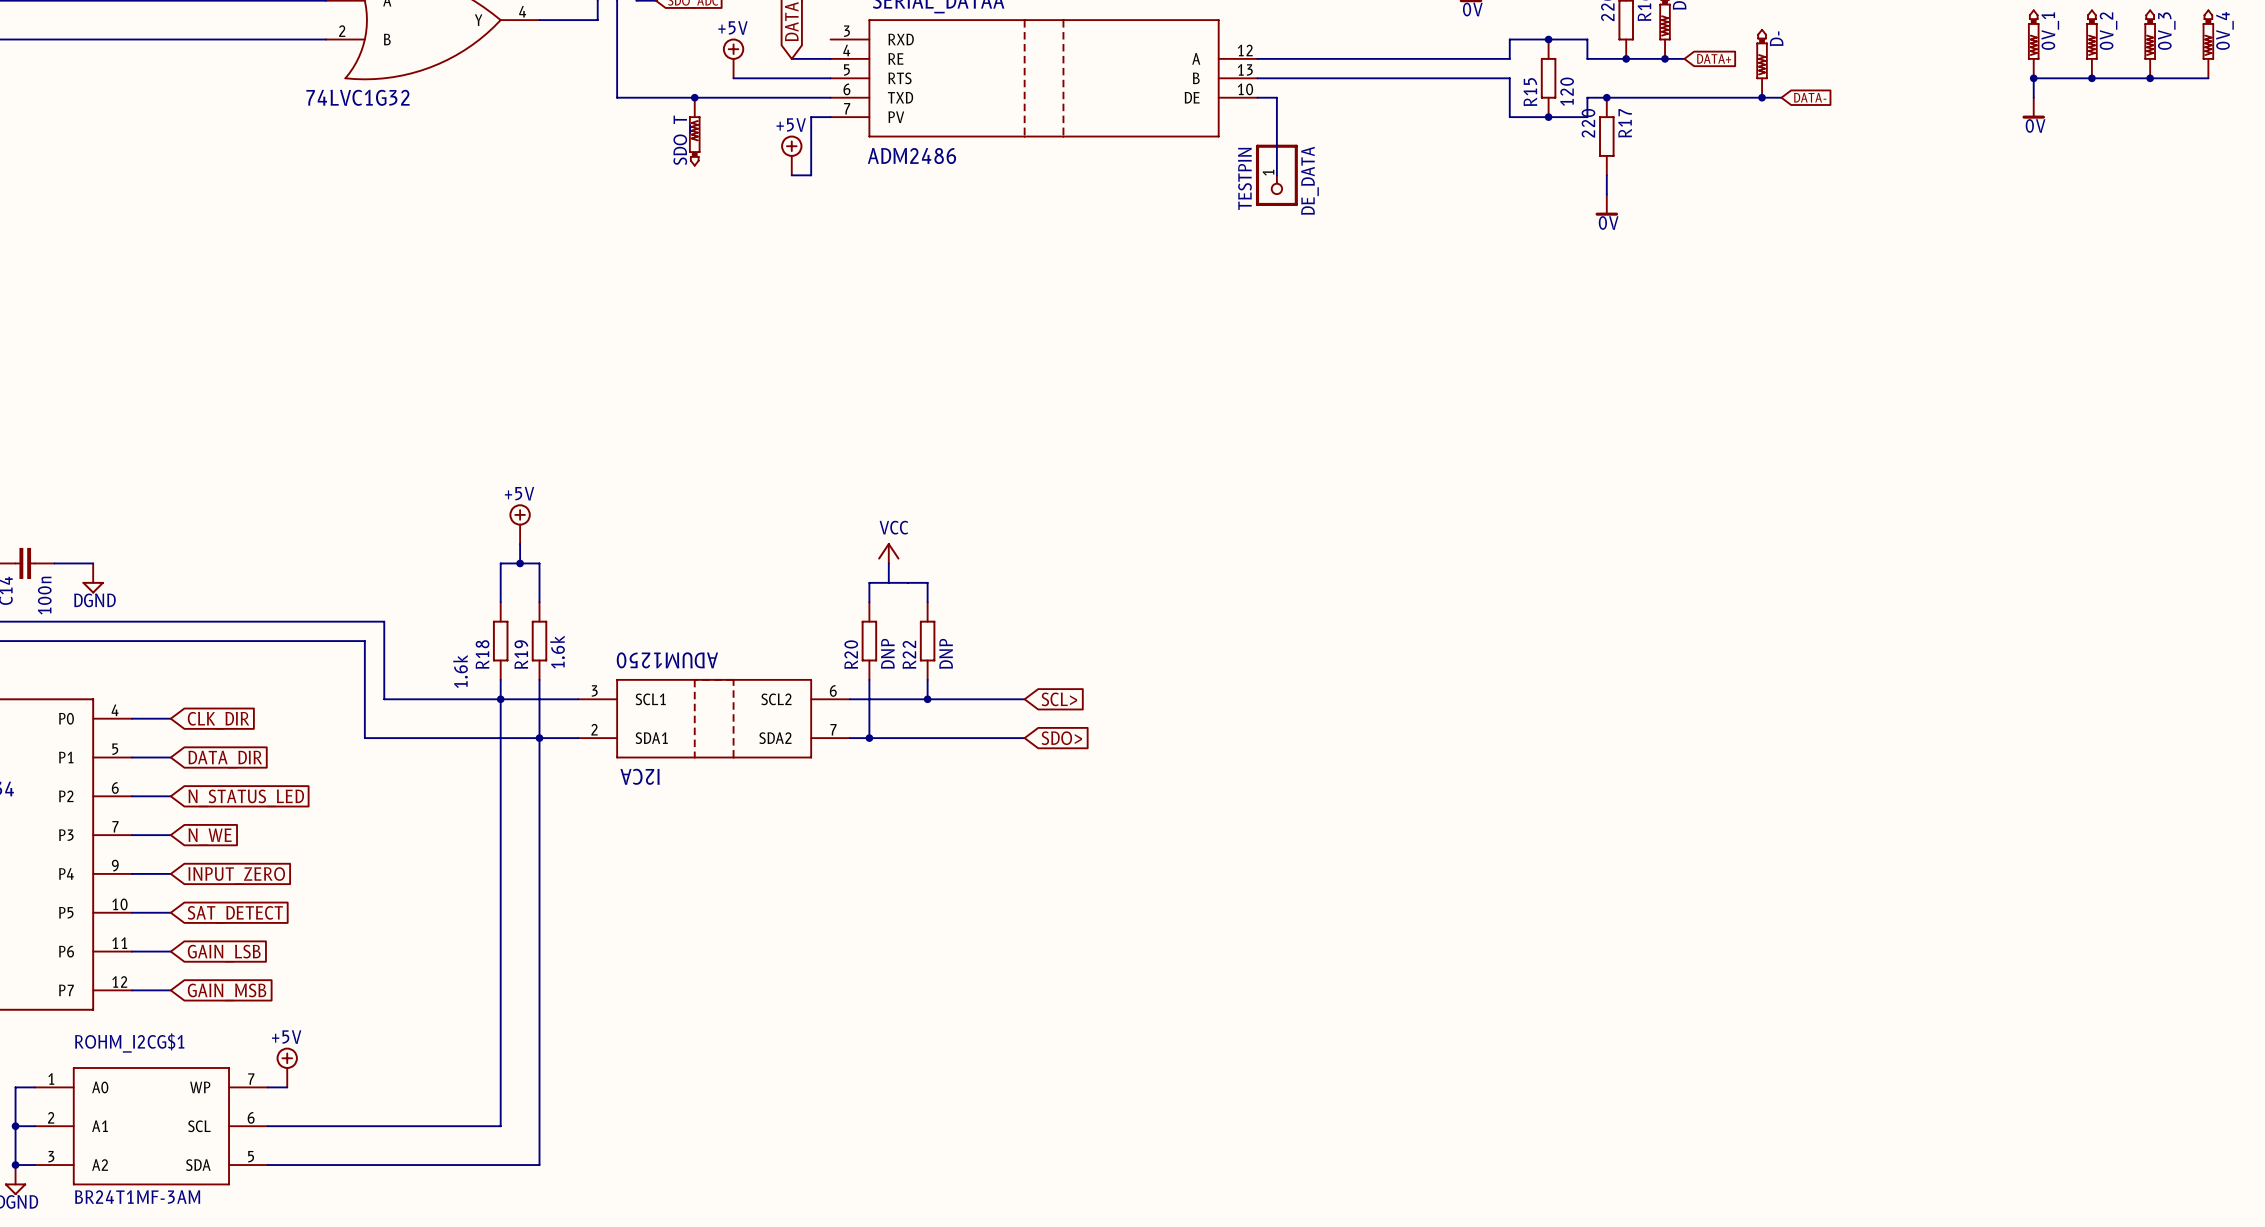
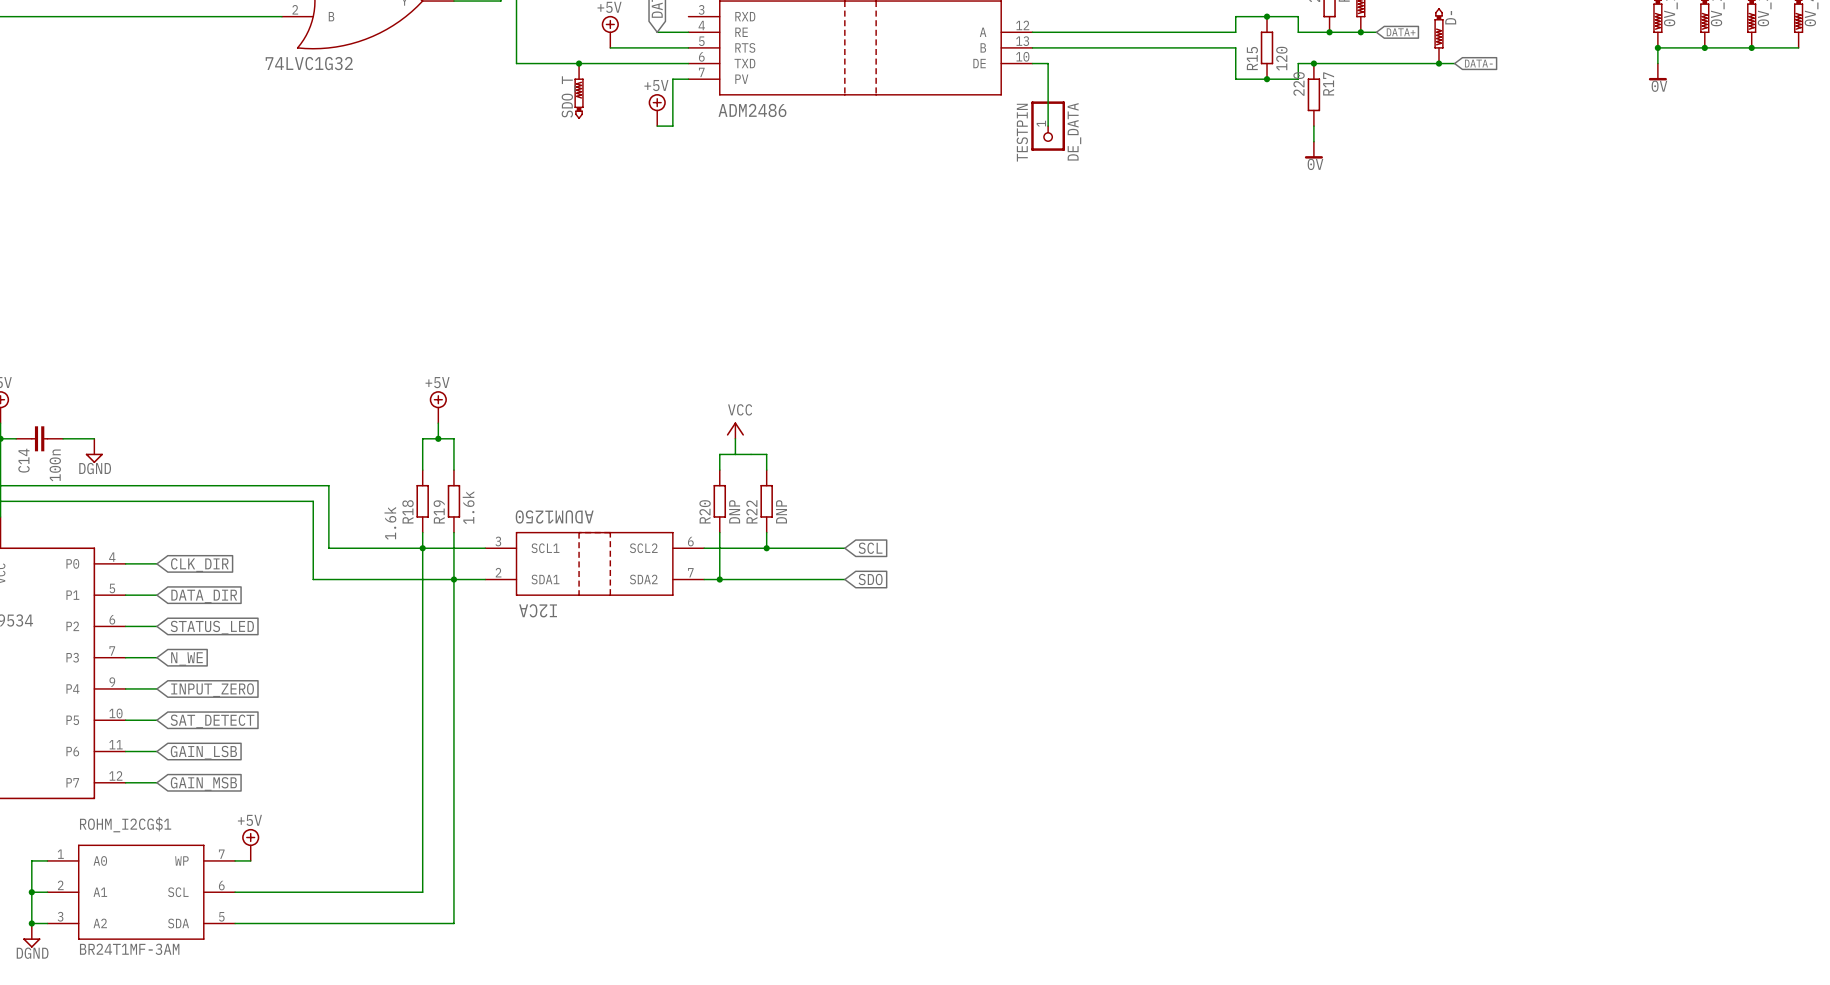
global label: SCL> (1059, 699) -> SCL (870, 548)
global label: SDO> (1061, 738) -> SDO (870, 579)
global label: N_STATUS_LED (246, 798) -> STATUS_LED (212, 627)

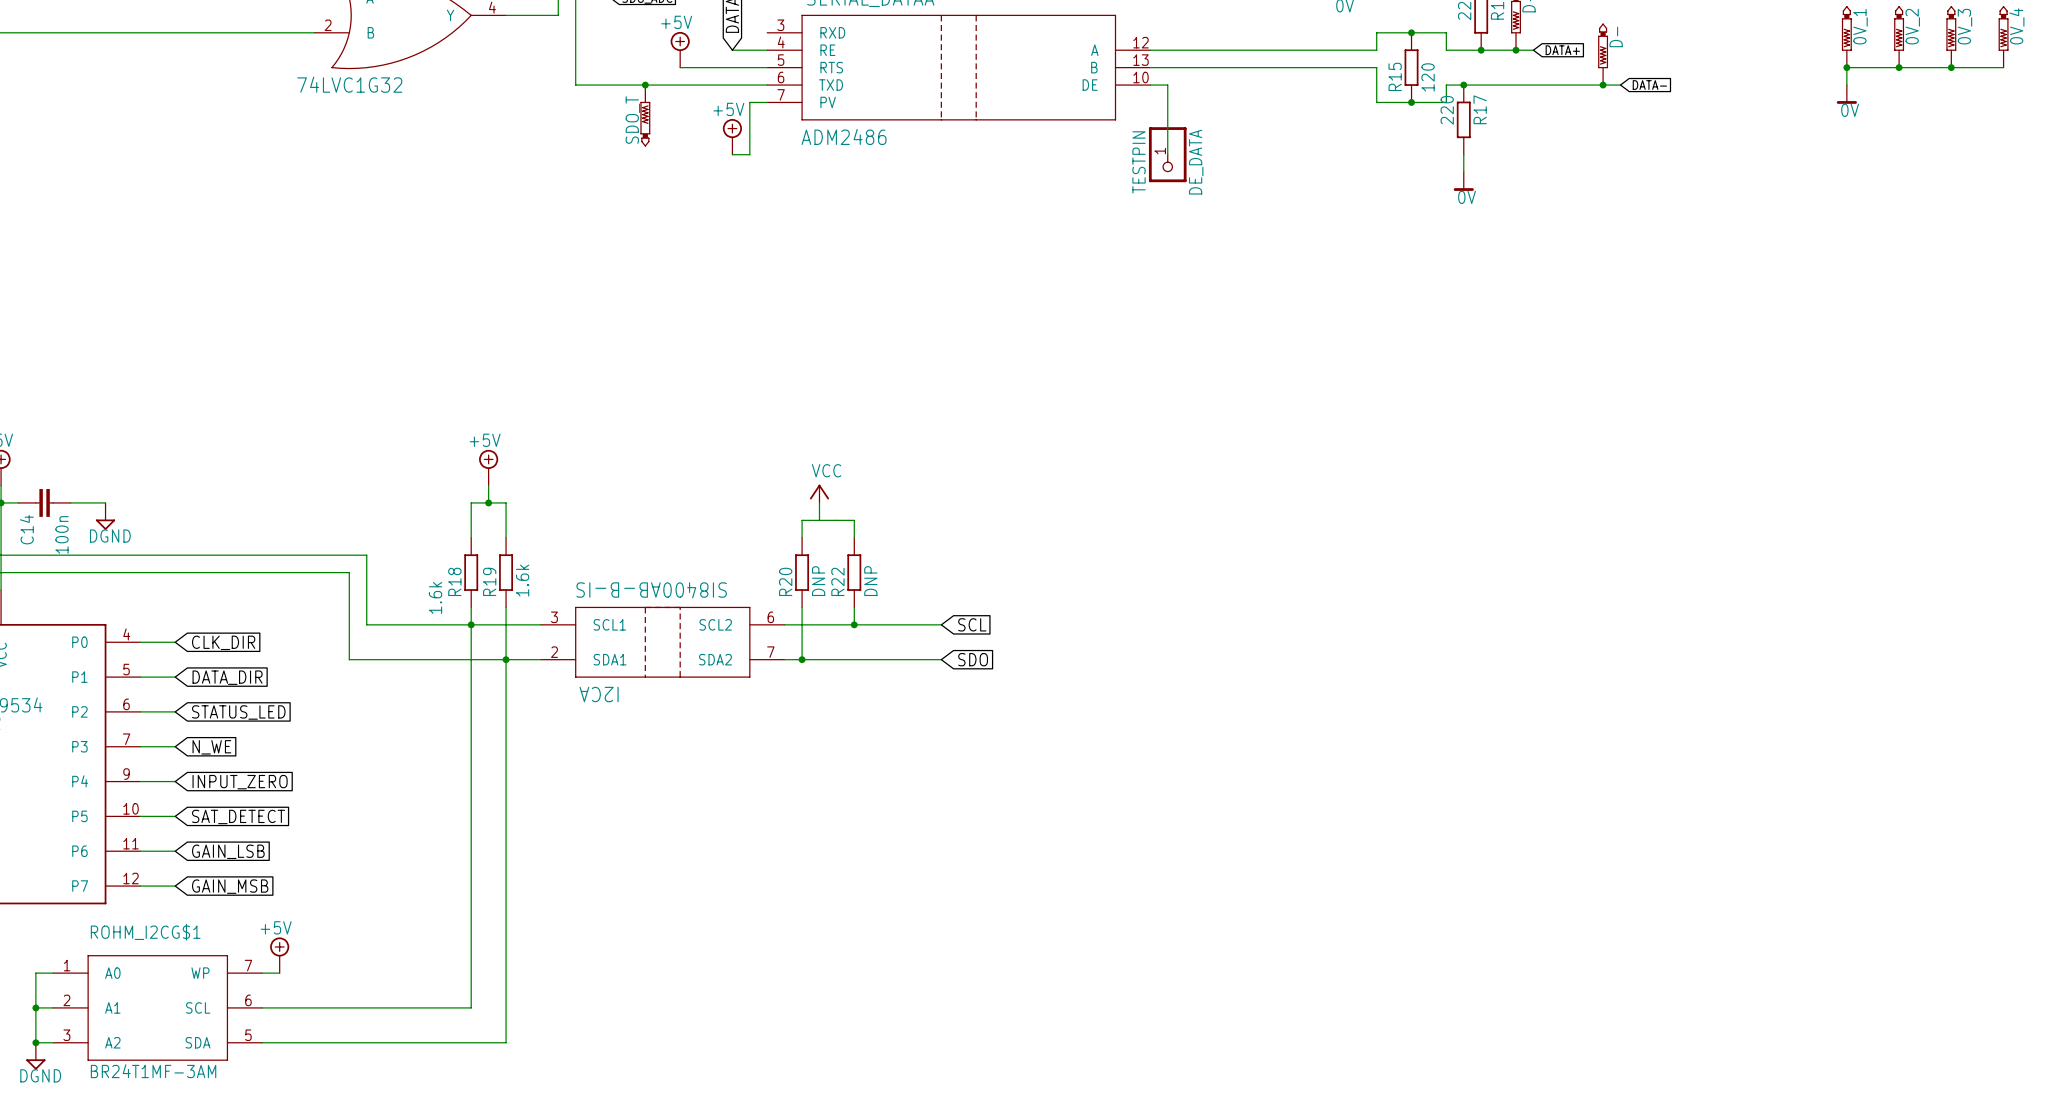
I2CA value: ADUM1250 (554, 516) -> SI8400AB-B-IS (651, 590)

